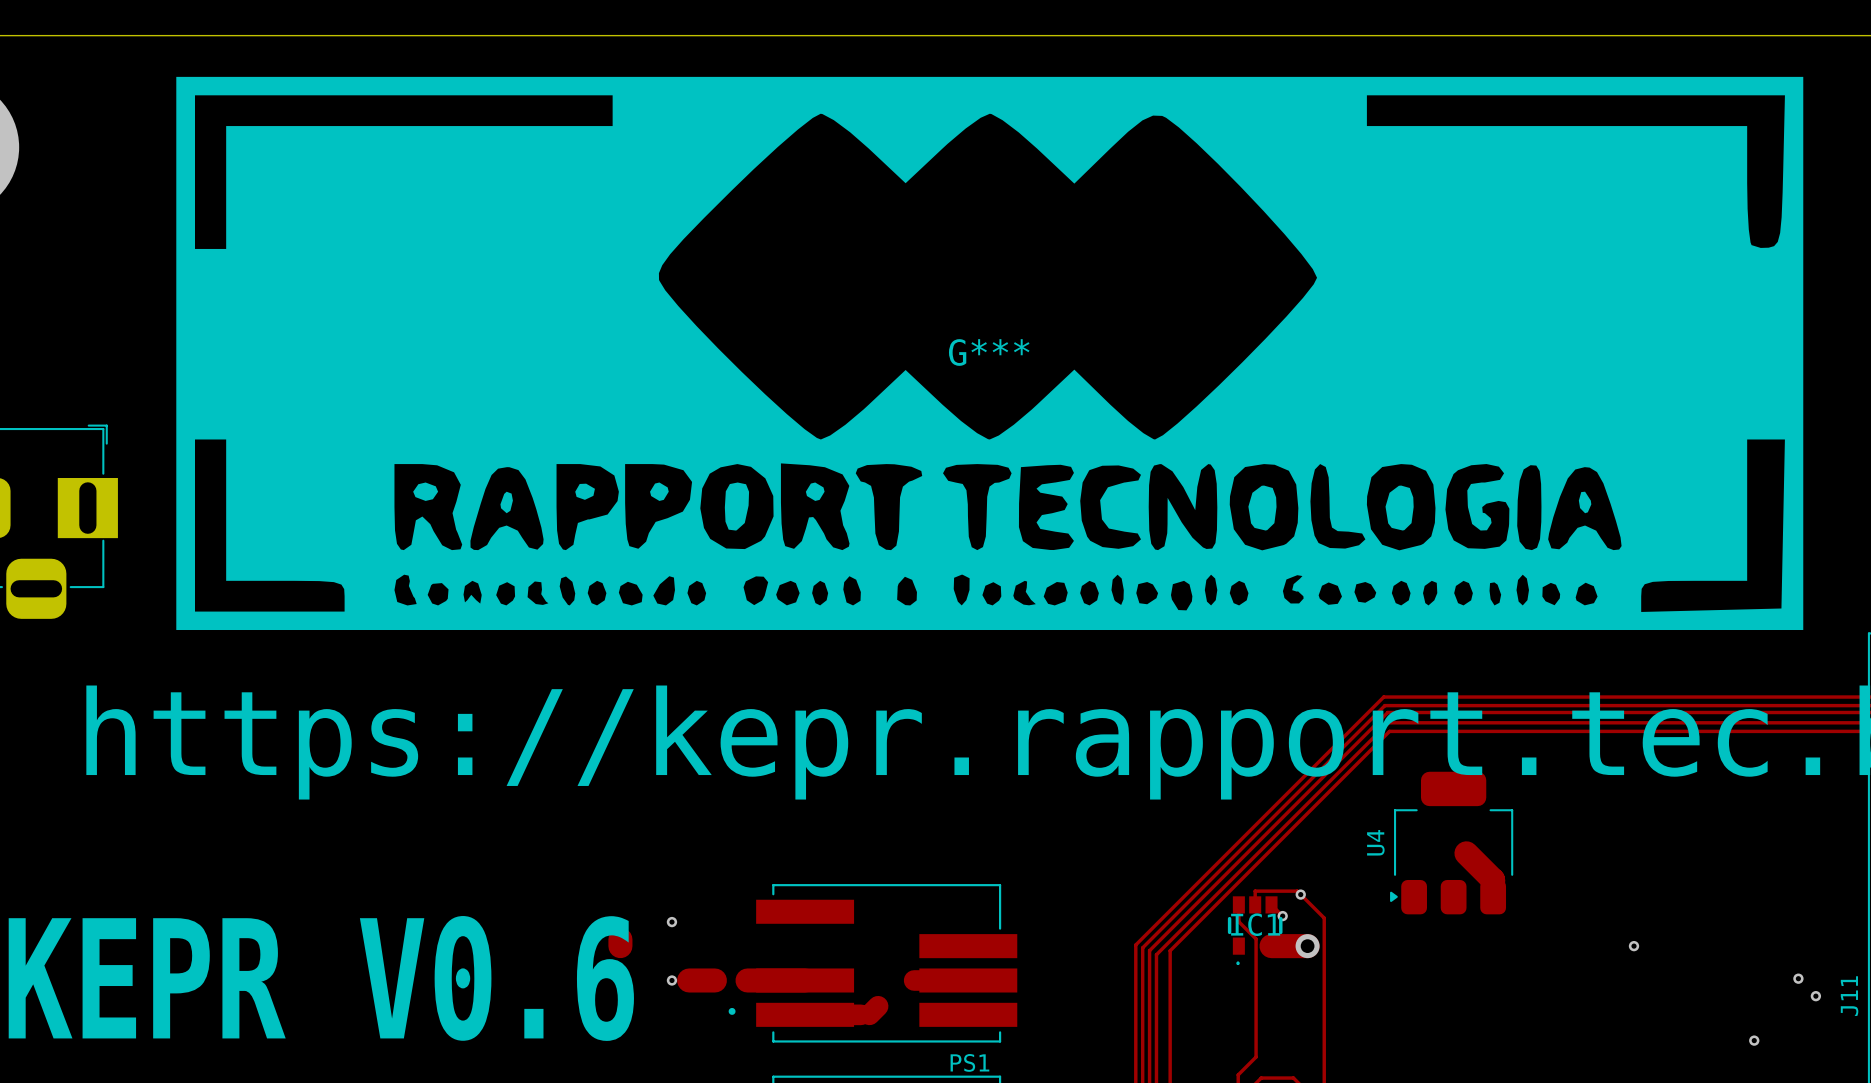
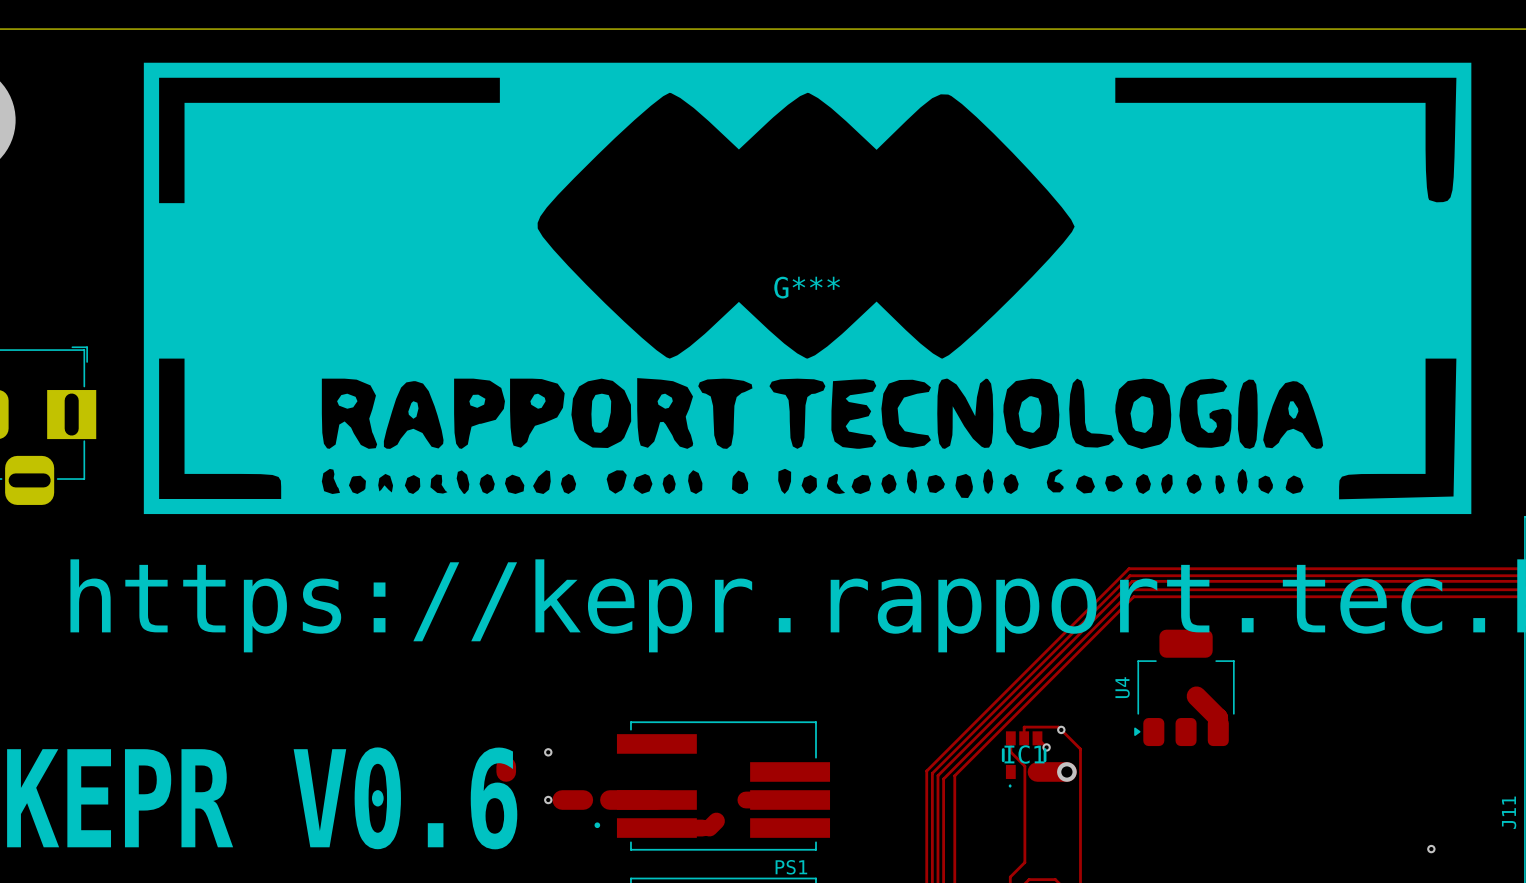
via: (1634, 946) -> none
via: (1798, 978) -> none
via: (1815, 996) -> none

